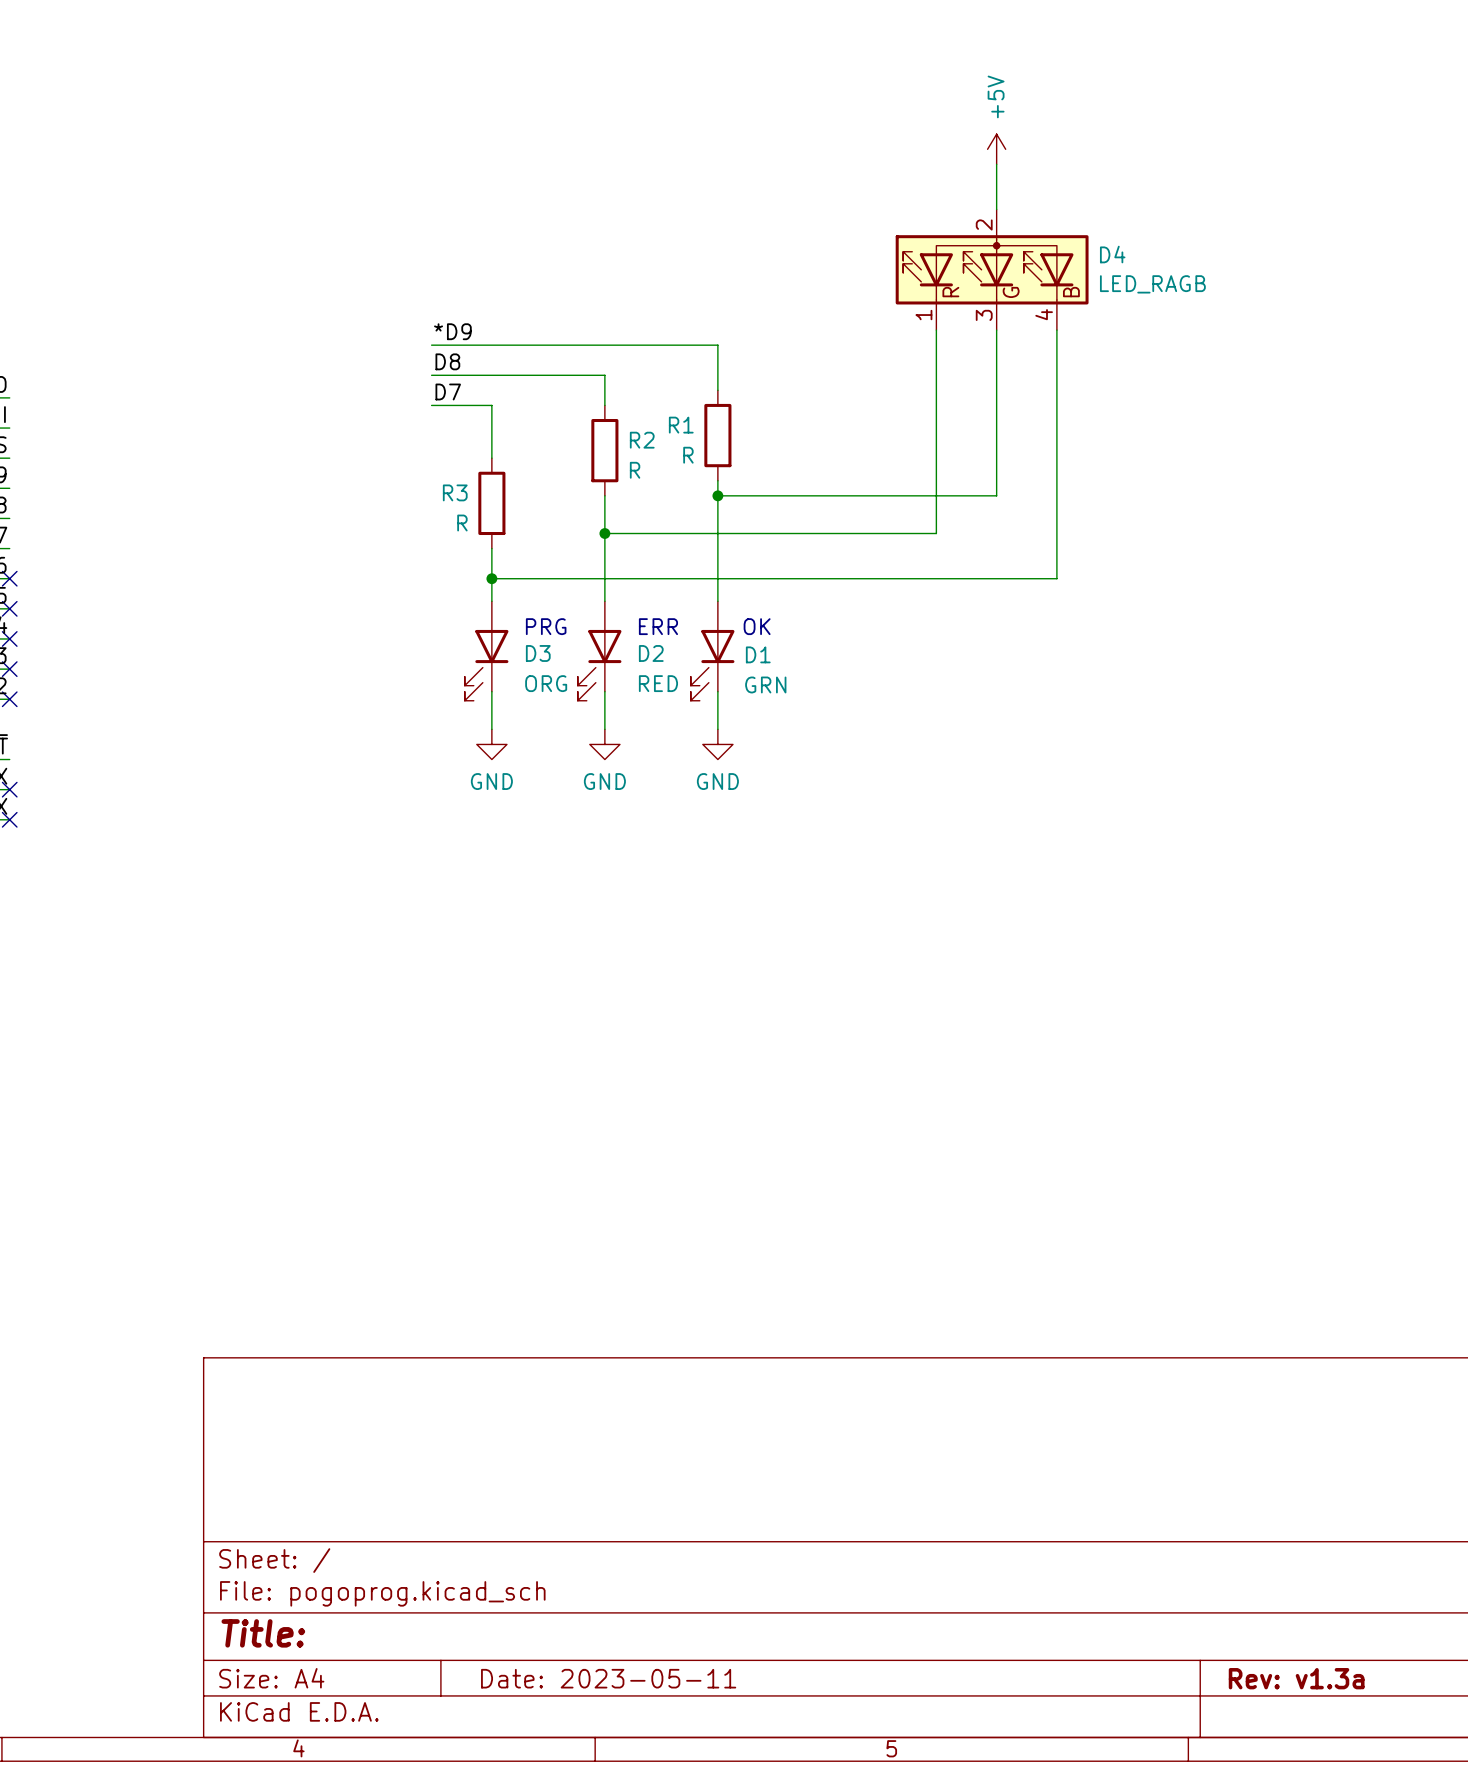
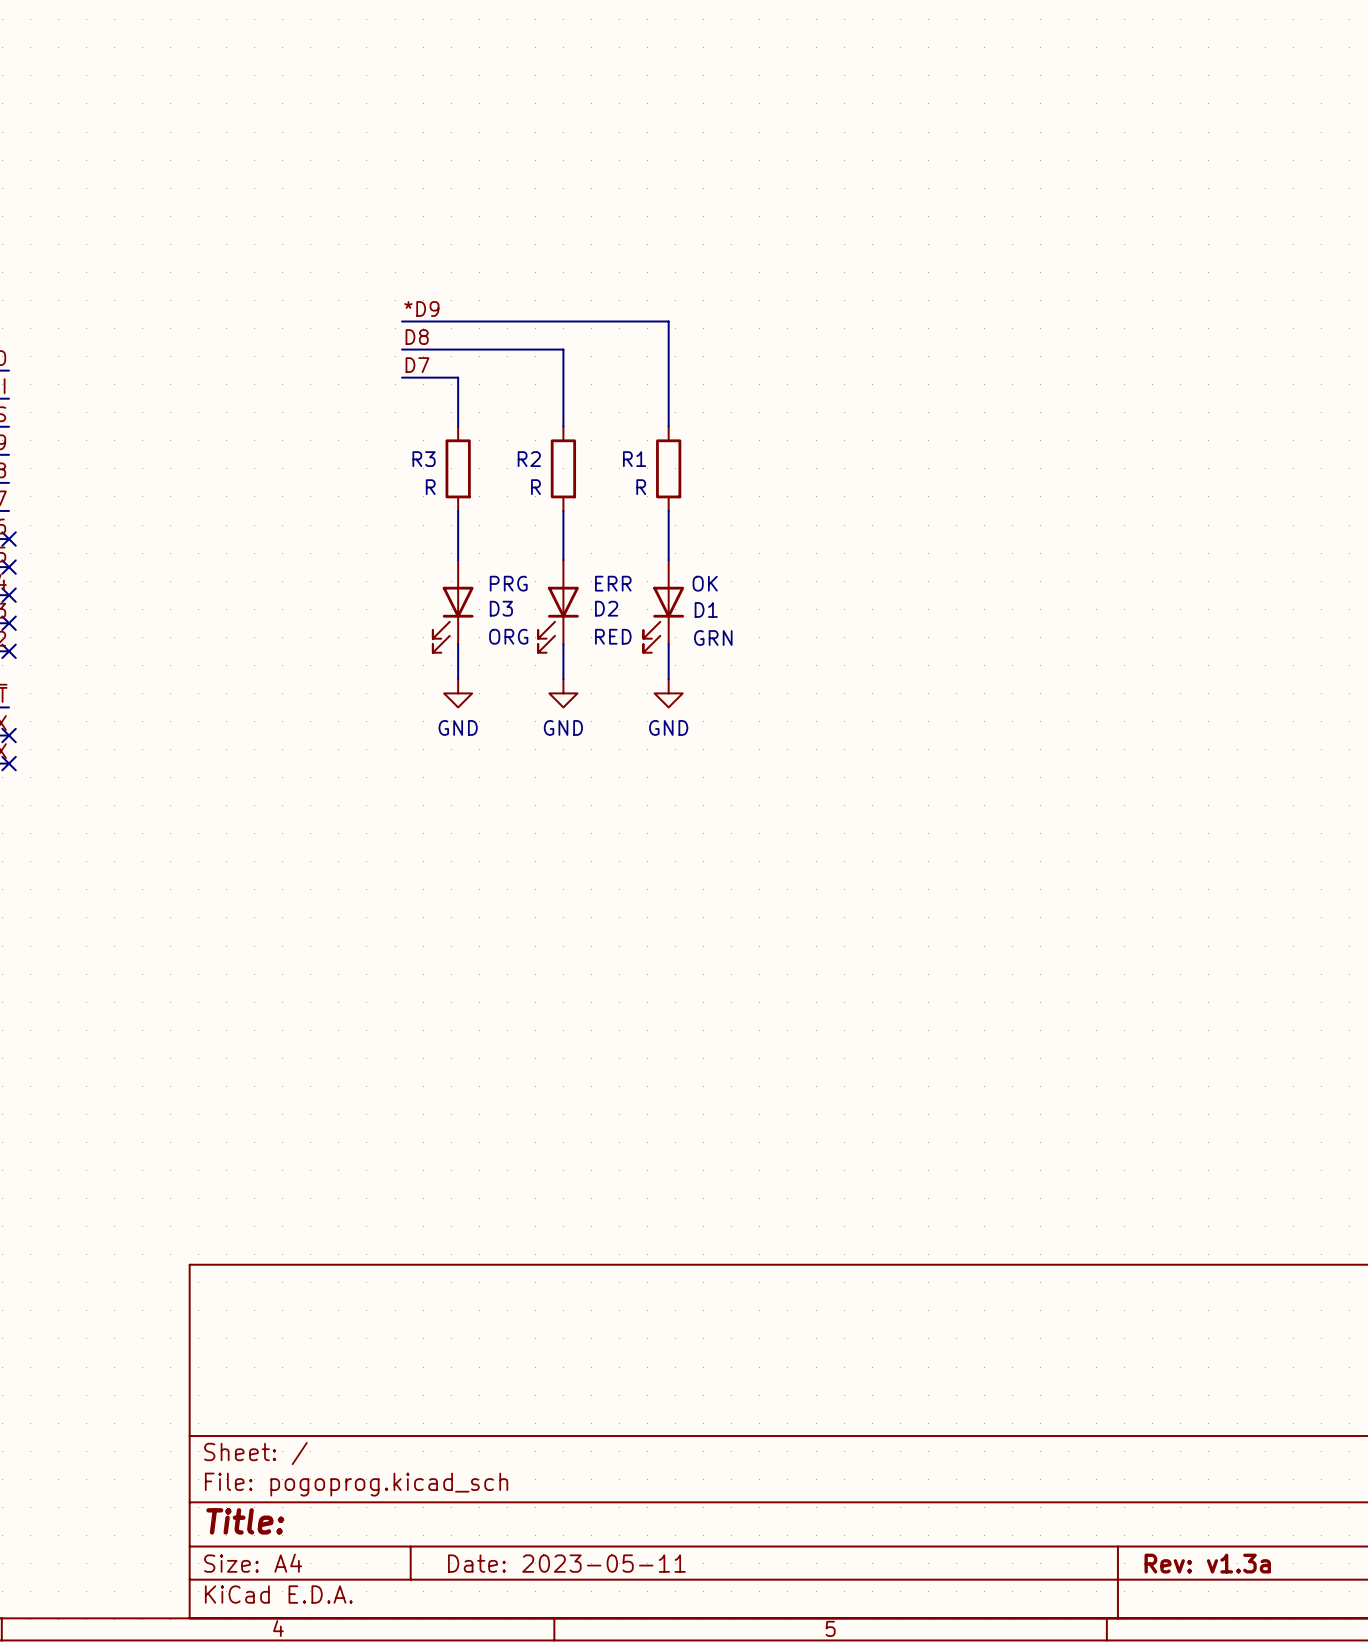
power symbol: +5V (996, 149) -> none
wire: (996, 164) (996, 209) -> none
D4: LED_RAGB (992, 269) -> none
wire: (936, 330) (936, 533) (604, 533) -> none
wire: (996, 330) (996, 495) (717, 495) -> none
wire: (1056, 330) (1056, 578) (491, 578) -> none
R1 position: (717, 435) -> (668, 468)
R2 name position: R2 (642, 440) -> R2 (529, 459)
R2 position: (604, 450) -> (563, 468)
R2 value position: R (635, 470) -> R (535, 487)
wire: (717, 480) (717, 548) -> (668, 363) (668, 426)
wire: (604, 495) (604, 548) -> (563, 377) (563, 426)
junction: (717, 495) -> none
junction: (604, 533) -> none
junction: (491, 578) -> none

